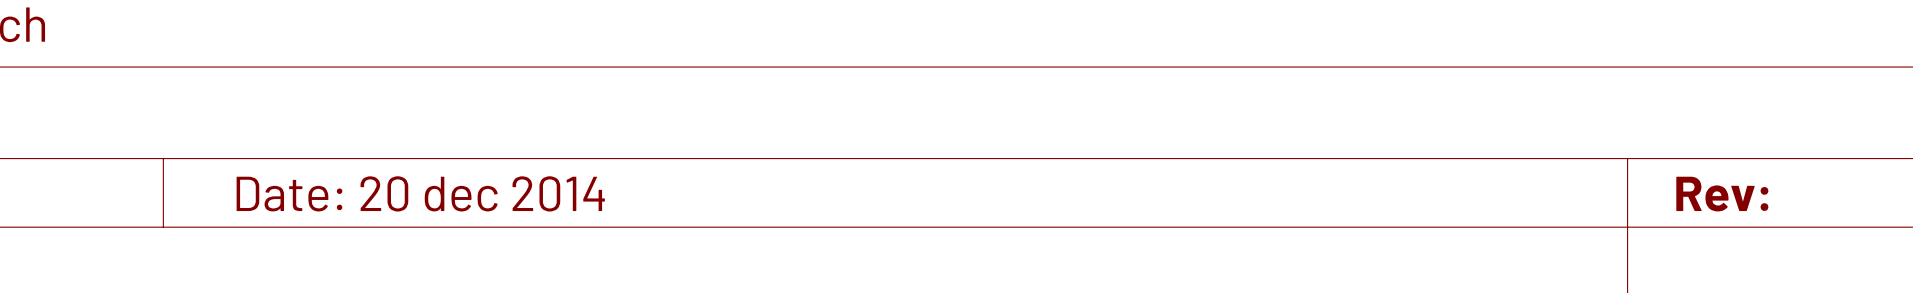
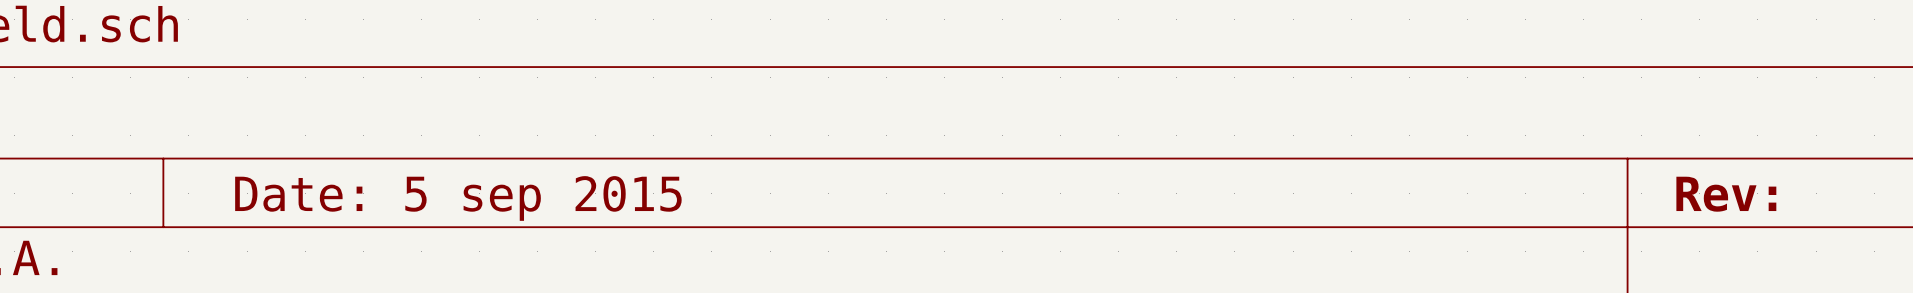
title block: Date: 20 dec 2014 (420, 193) -> Date: 5 sep 2015 (458, 198)

